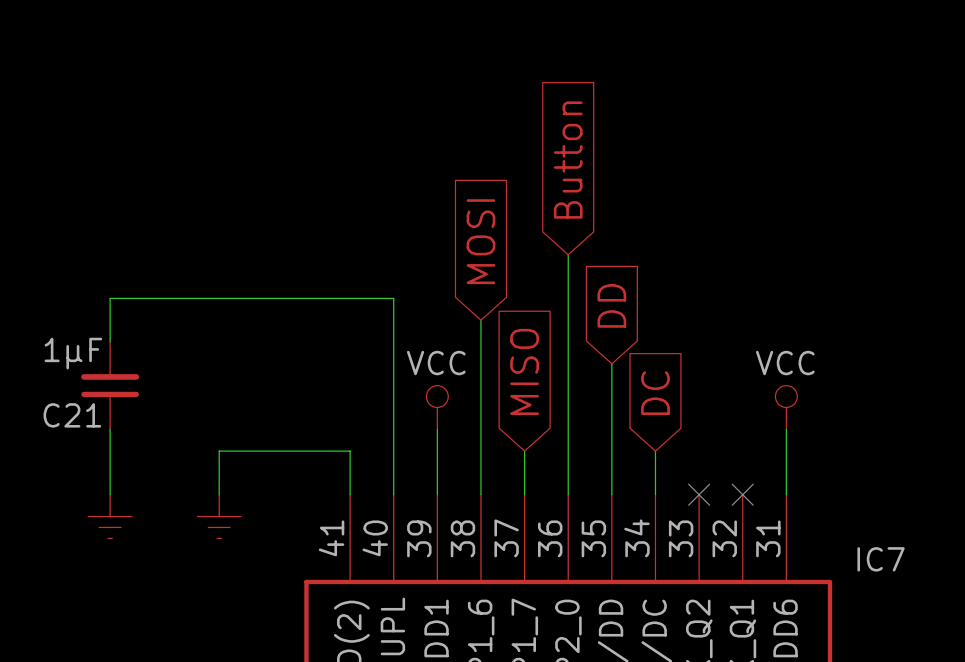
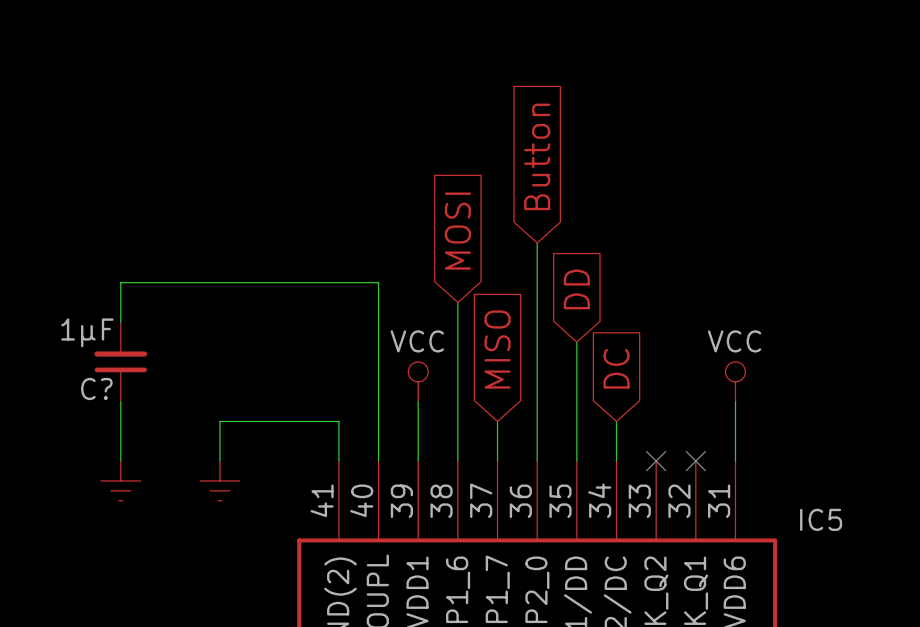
C21 name: C21 (72, 415) -> C? (96, 388)
IC7 name: IC7 (881, 559) -> IC5 (821, 519)

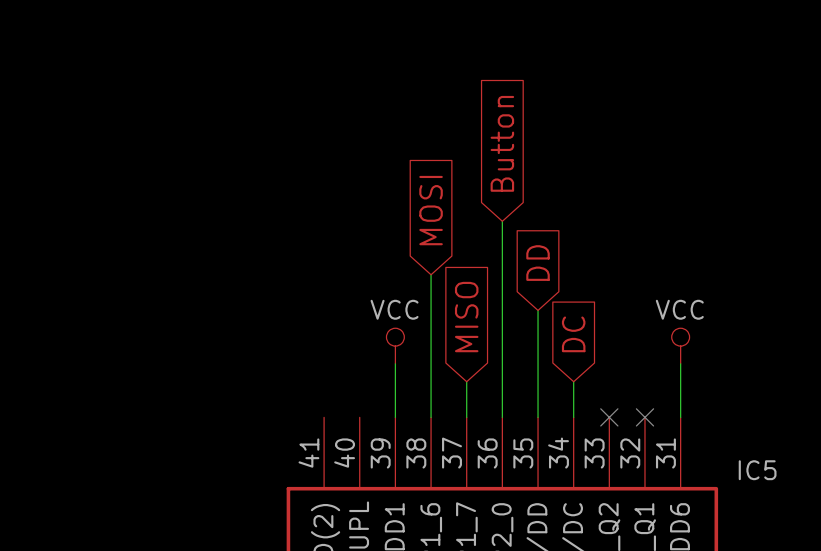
wire: (120, 322) (120, 282) (378, 282) (378, 461) -> none
C?: 1μF (120, 361) -> none
wire: (120, 401) (120, 461) -> none
wire: (219, 461) (219, 421) (338, 421) (338, 461) -> none
power symbol: (120, 480) -> none
power symbol: (219, 480) -> none

